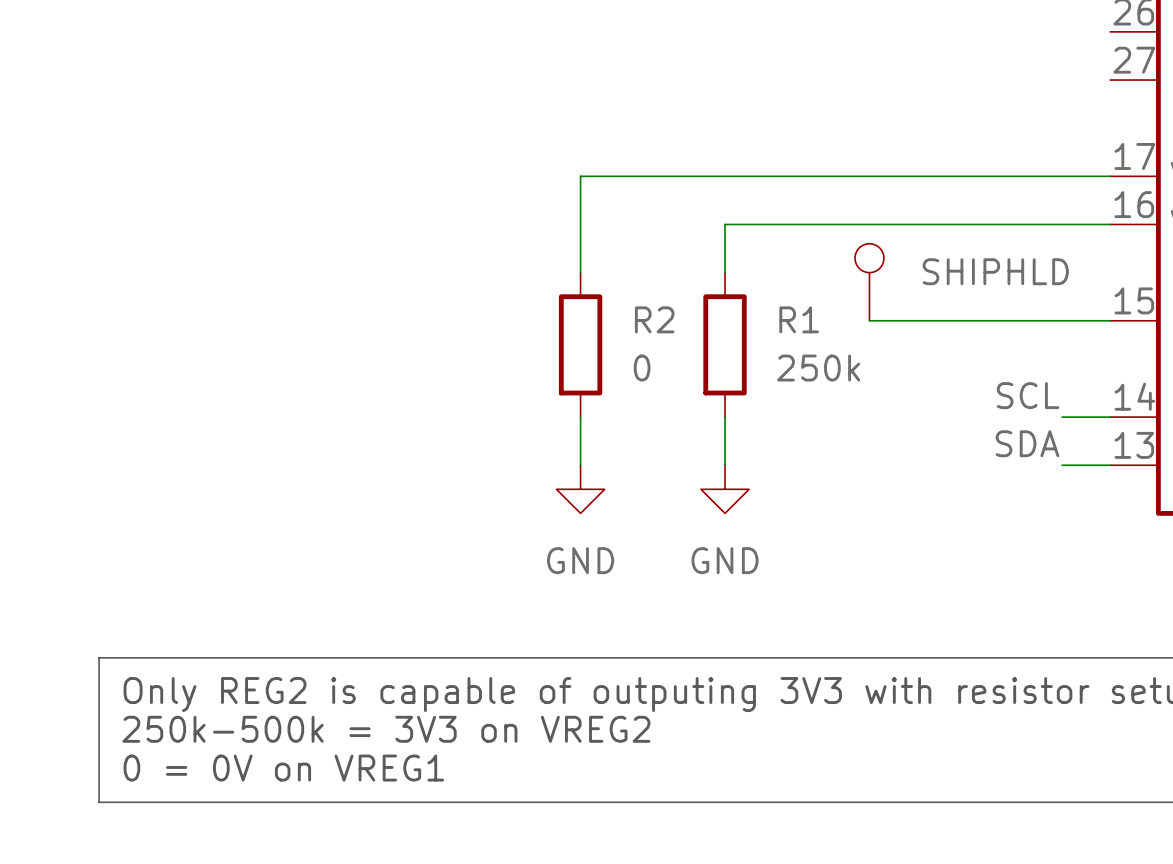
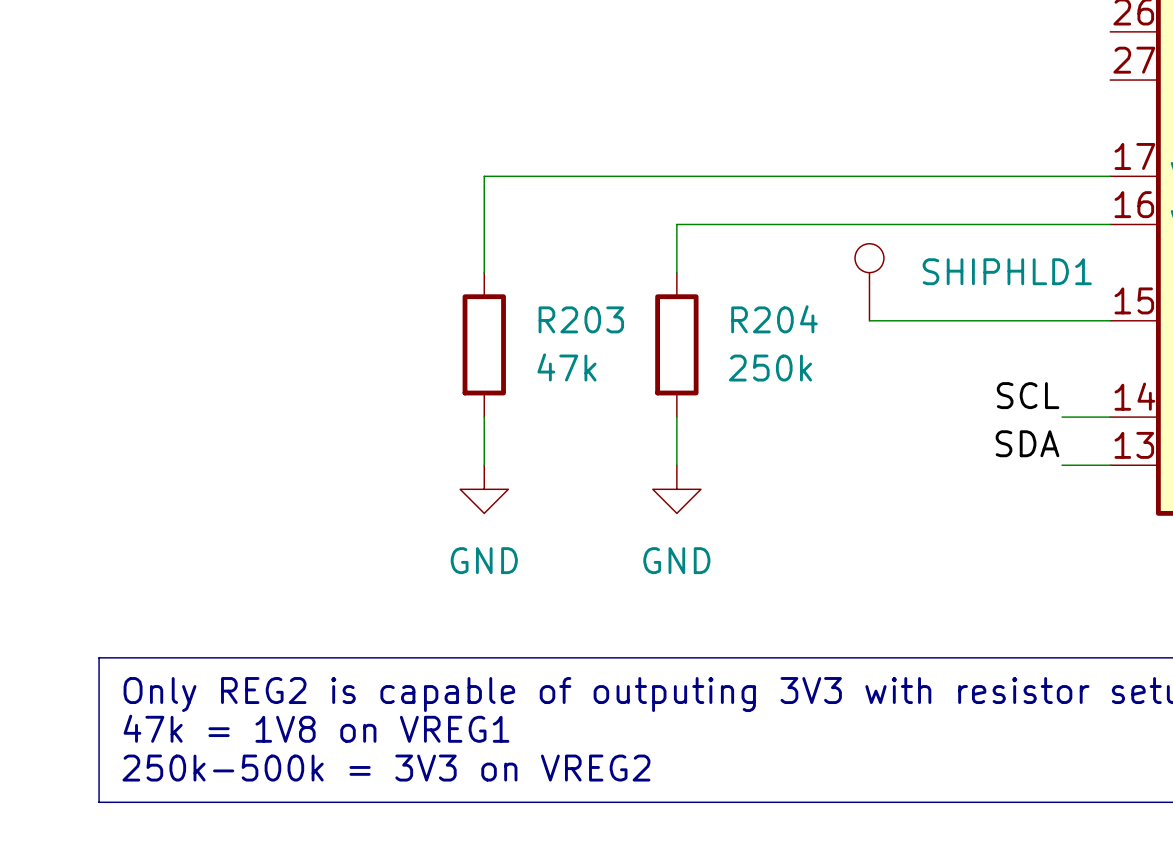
wire: (580, 176) (580, 272) -> (580, 176) (484, 176) (484, 272)
wire: (725, 224) (725, 272) -> (725, 224) (676, 224) (676, 272)
SHIPHLD name: SHIPHLD (995, 271) -> SHIPHLD1 (1007, 271)
R203: none -> 47k (484, 344)
R2: 0 (580, 344) -> none
R204: none -> 250k (676, 344)
R1: 250k (725, 344) -> none
wire: (580, 417) (580, 465) -> (484, 417) (484, 465)
wire: (725, 417) (725, 465) -> (676, 417) (676, 465)
power symbol: none -> GND (484, 489)
power symbol: GND (580, 489) -> none
power symbol: none -> GND (676, 489)
power symbol: GND (725, 489) -> none
text: 250k-500k = 3V3 on VREG2 (386, 729) -> 47k = 1V8 on VREG1 (316, 728)
text: 0 = 0V on VREG1 (283, 768) -> 250k-500k = 3V3 on VREG2 (386, 768)

